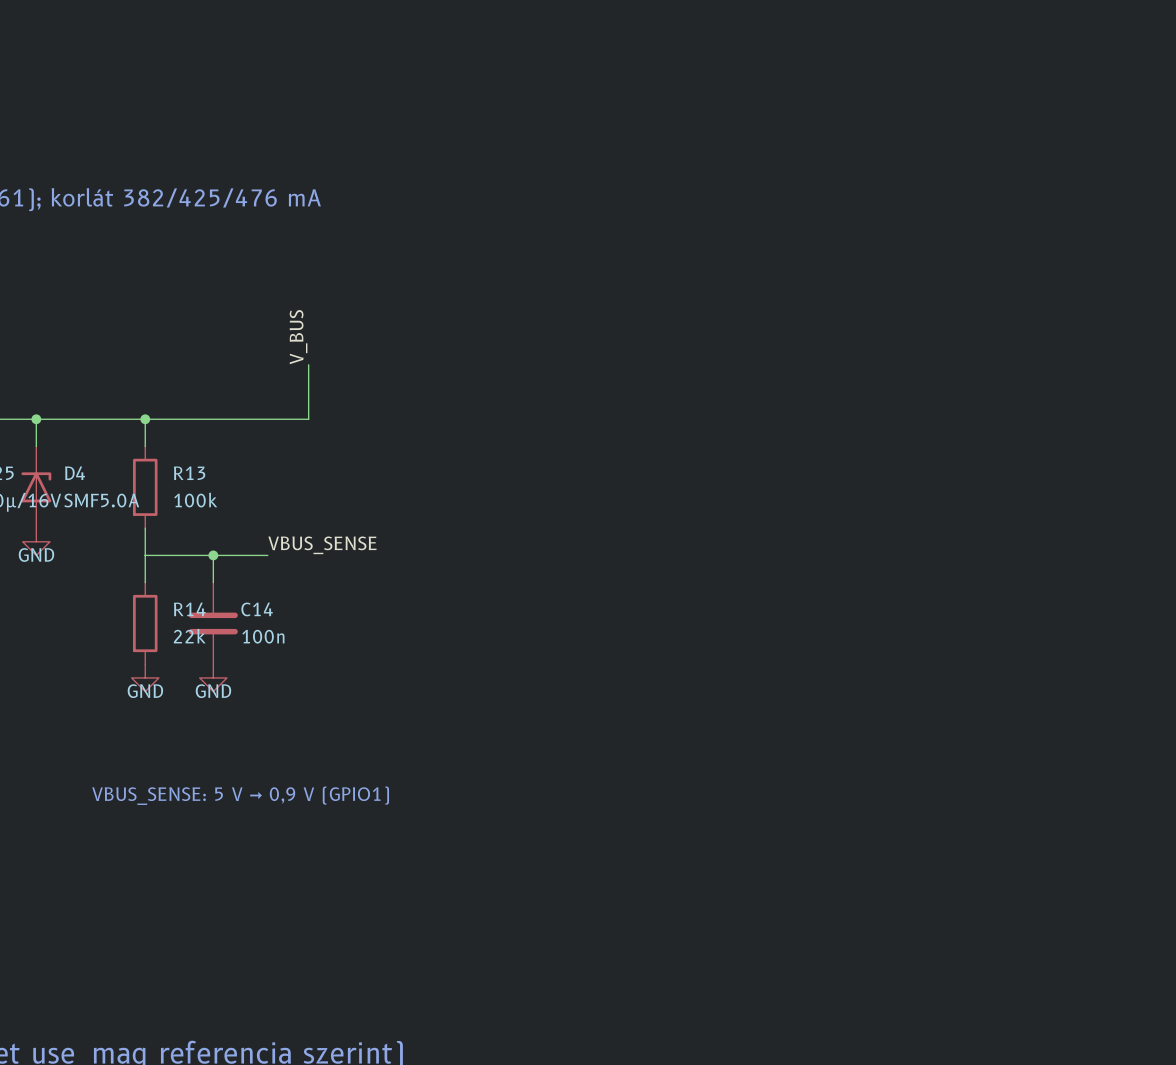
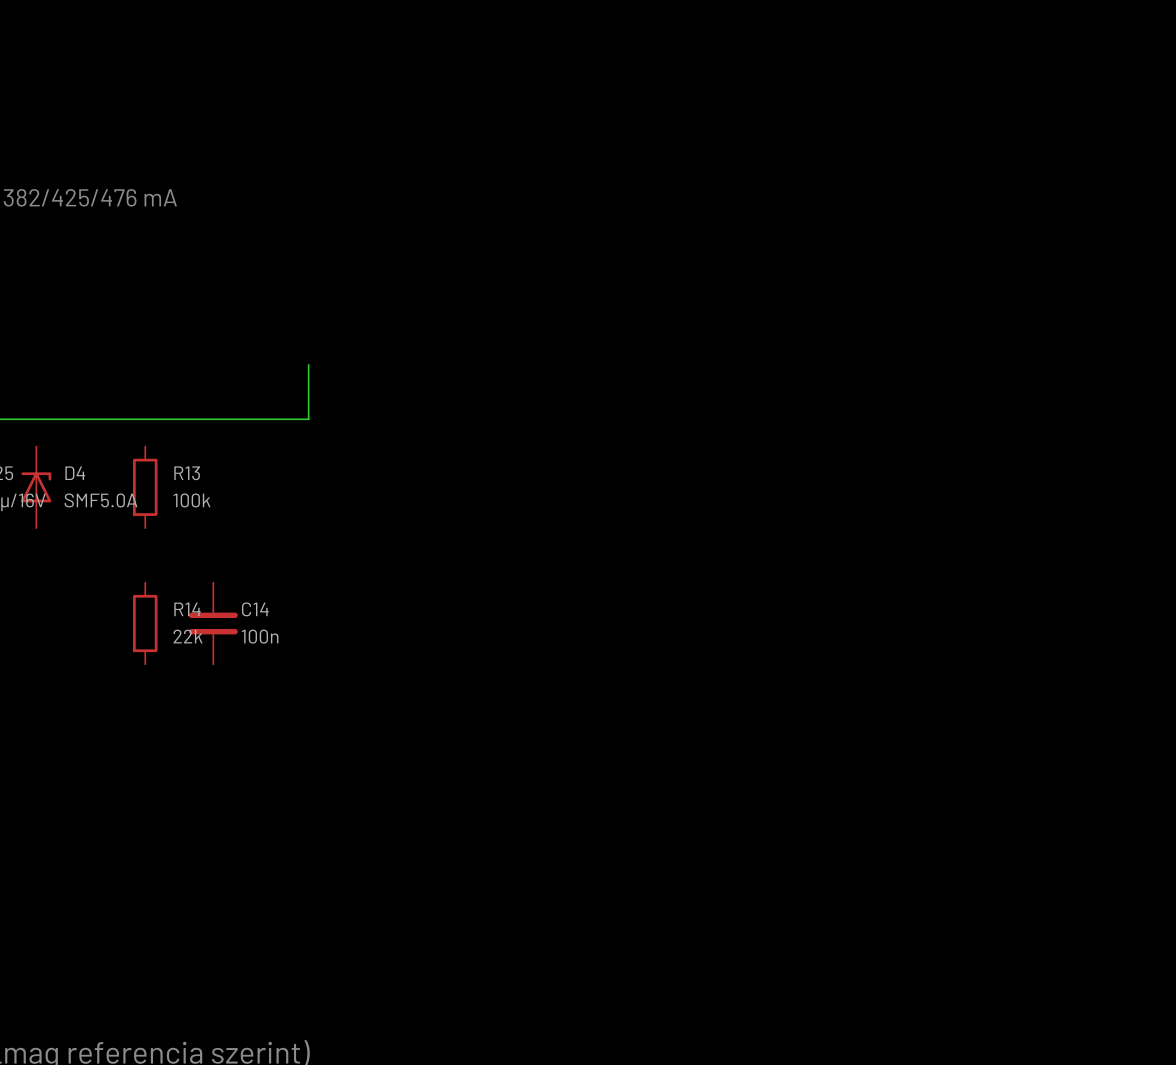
label: V_BUS (298, 337) -> none
wire: (36, 419) (36, 446) -> none
junction: (36, 419) -> none
wire: (145, 419) (145, 446) -> none
junction: (145, 419) -> none
wire: (145, 528) (145, 582) -> none
power symbol: GND (36, 541) -> none
label: VBUS_SENSE (322, 545) -> none
wire: (145, 555) (267, 555) -> none
wire: (213, 555) (213, 582) -> none
junction: (213, 555) -> none
power symbol: GND (145, 677) -> none
power symbol: GND (213, 677) -> none
text: VBUS_SENSE: 5 V → 0,9 V (GPIO1) (240, 795) -> none

